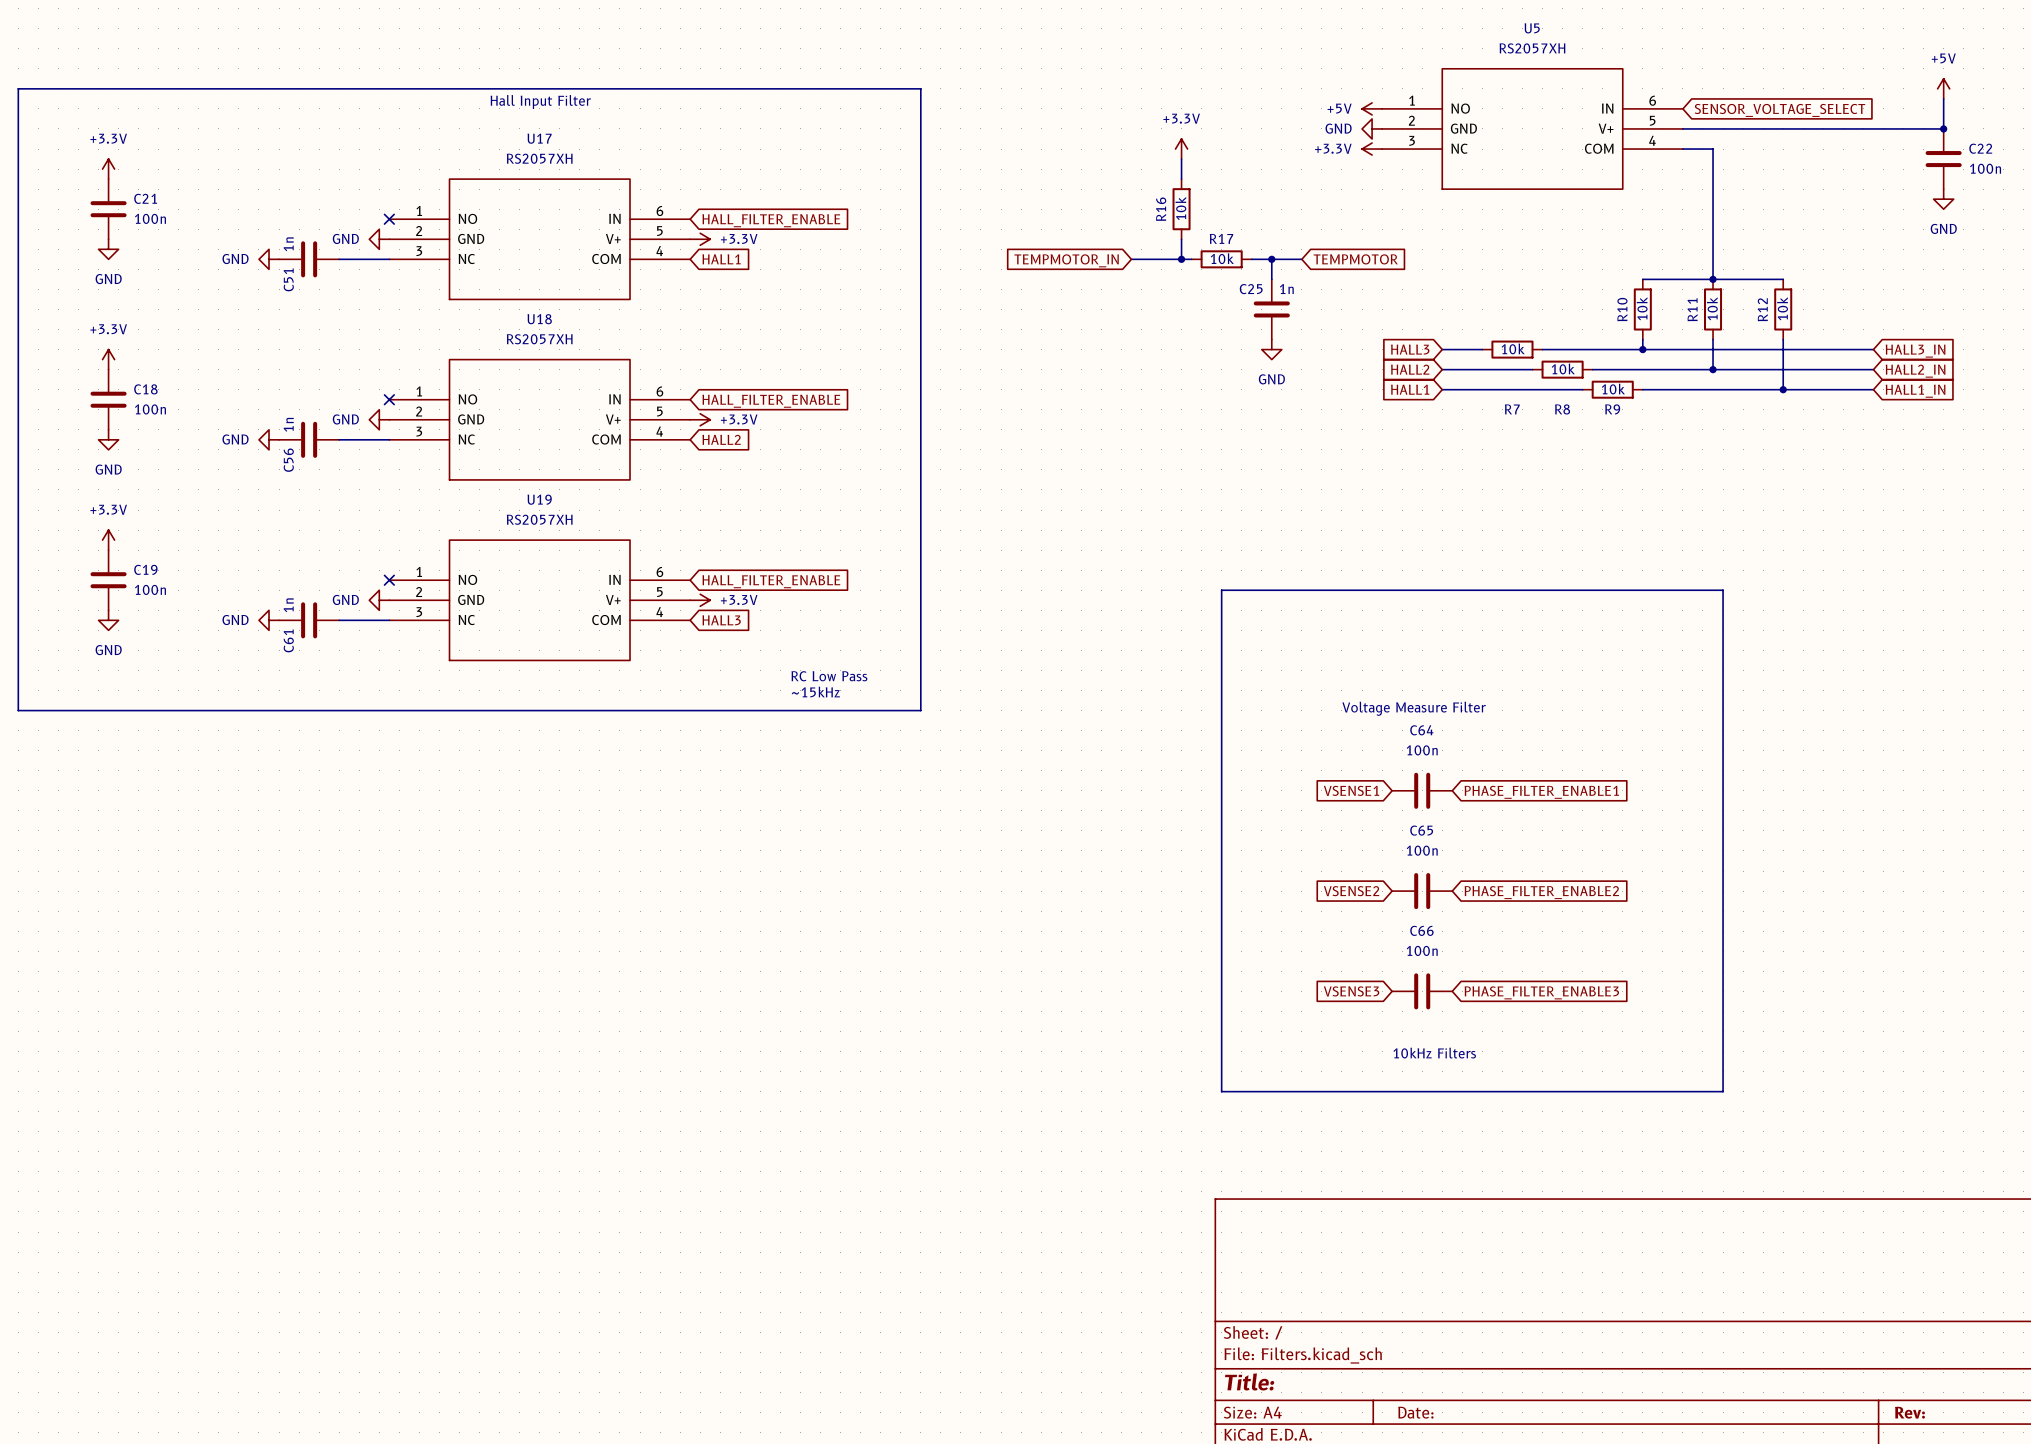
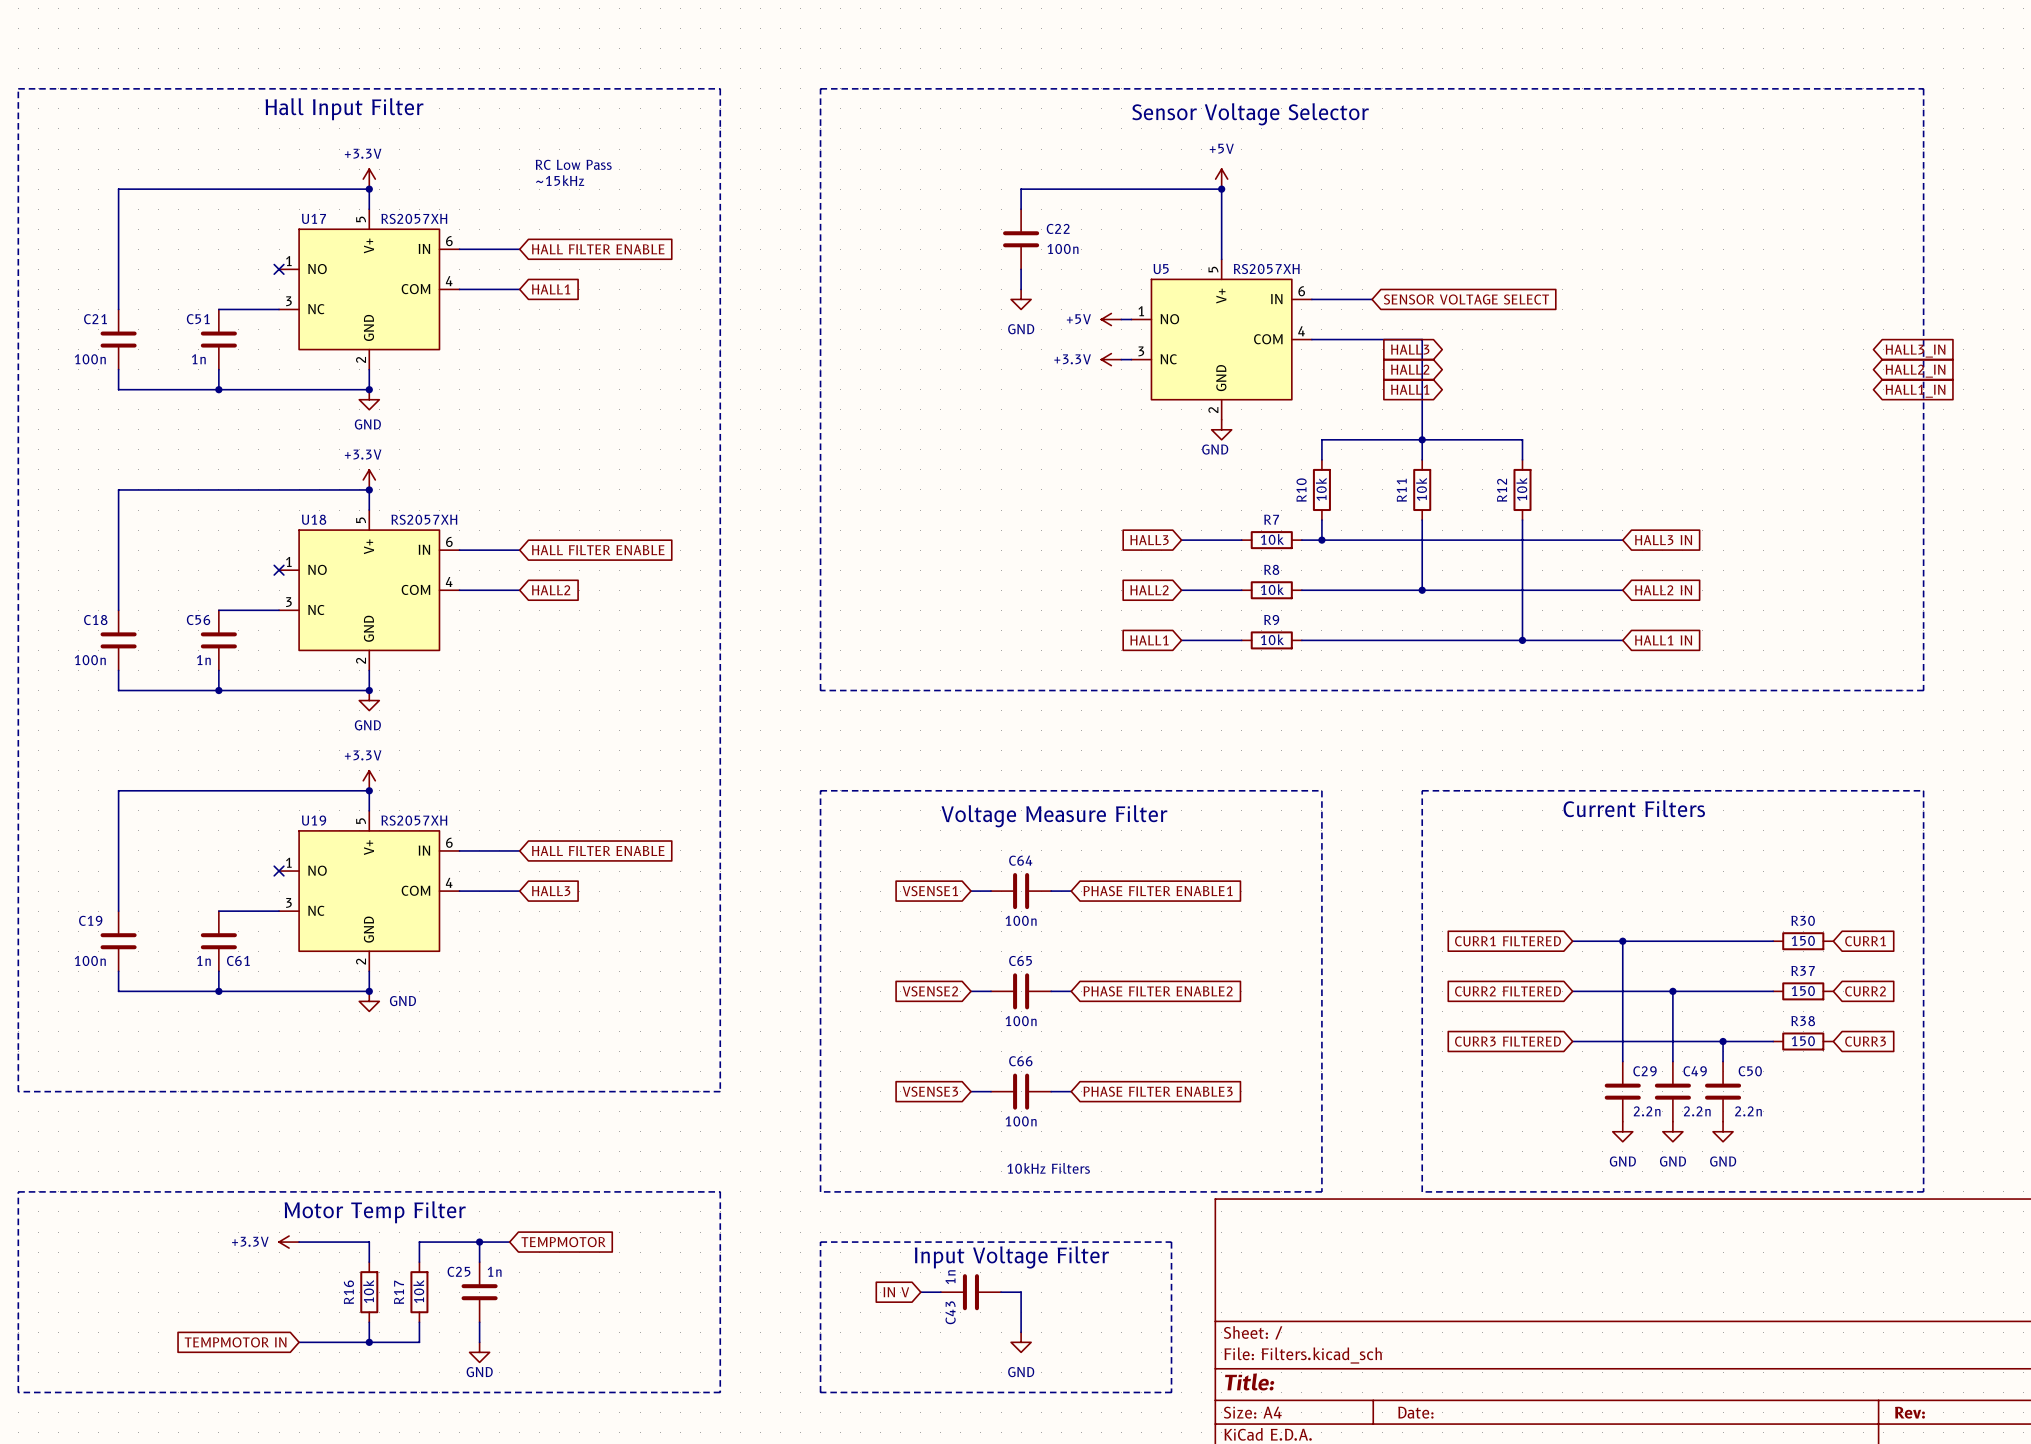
U5 name position: U5 (1532, 28) -> U5 (1161, 269)
U5 value position: RS2057XH (1532, 48) -> RS2057XH (1266, 269)
U5 symbol: [1382, 68, 1683, 190] -> [1131, 259, 1312, 420]
line: (18, 88) (920, 88) (920, 710) (18, 710) (18, 88) -> (18, 88) (18, 1091) (720, 1091) (720, 88) (18, 88)
line: none -> (820, 88) (820, 690) (1923, 690) (1923, 88) (820, 88)
power symbol: +5V (1943, 88) -> none
wire: (1943, 98) (1943, 128) (1682, 128) -> none
text: Hall Input Filter (540, 102) -> none
power symbol rotation: 0° (1372, 108) -> 90° clockwise (1221, 179)
power symbol position: +5V (1372, 108) -> +5V (1221, 179)
text: none -> Hall Input Filter (344, 109)
global label: SENSOR_VOLTAGE_SELECT (1779, 110) -> none
text: none -> Sensor Voltage Selector (1250, 114)
power symbol: GND (1372, 128) -> none
junction: (1943, 128) -> none
U17 name position: U17 (539, 138) -> U17 (313, 218)
power symbol: +3.3V (1181, 149) -> none
power symbol: +3.3V (1372, 149) -> none
wire: (1682, 149) (1713, 149) (1713, 279) -> none
U17 value position: RS2057XH (539, 158) -> RS2057XH (414, 218)
wire: (1181, 159) (1181, 179) -> none
C22 position: (1943, 159) -> (1021, 239)
text: none -> RC Low Pass (573, 164)
power symbol: +3.3V (108, 169) -> none
power symbol: none -> +3.3V (369, 179)
U17 symbol: [389, 179, 691, 300] -> [279, 209, 460, 370]
text: none -> ~15kHz (560, 180)
junction: none -> (369, 189)
junction: none -> (1221, 189)
C21 name position: C21 (145, 198) -> C21 (95, 319)
power symbol: GND (1943, 199) -> none
C21 position: (108, 209) -> (118, 339)
wire: none -> (369, 209) (369, 189) (118, 189) (118, 309)
wire: none -> (1021, 209) (1021, 189) (1221, 189) (1221, 259)
R16 position: (1181, 209) -> (369, 1292)
C21 value position: 100n (150, 218) -> 100n (90, 359)
no-connect mark: (389, 219) -> none
global label: HALL_FILTER_ENABLE (771, 220) -> none
R17 name position: R17 (1221, 238) -> R17 (398, 1292)
power symbol: GND (379, 239) -> none
power symbol: +3.3V (700, 239) -> none
wire: (1181, 239) (1181, 259) -> (1021, 269) (1021, 289)
C51 value position: 1n (288, 244) -> 1n (198, 359)
power symbol: GND (108, 249) -> none
wire: none -> (459, 249) (519, 249)
global label: none -> HALL FILTER ENABLE (598, 249)
power symbol: GND (269, 259) -> none
C51 rotation: 0° (309, 259) -> 90° clockwise (218, 339)
C51 position: (309, 259) -> (218, 339)
global label position: HALL1 (721, 259) -> HALL1 (551, 289)
wire: (1131, 259) (1191, 259) -> (1311, 299) (1372, 299)
junction: (1181, 259) -> none
R17 rotation: 0° (1221, 259) -> 90° clockwise (419, 1292)
R17 position: (1221, 259) -> (419, 1292)
wire: (1251, 259) (1301, 259) -> none
wire: (1271, 259) (1271, 279) -> none
junction: (1271, 259) -> none
global label: TEMPMOTOR (1355, 259) -> none
global label: TEMPMOTOR_IN (1066, 260) -> none
no-connect mark: none -> (279, 269)
wire: (1642, 279) (1783, 279) -> none
junction: (1713, 279) -> none
wire: none -> (459, 289) (519, 289)
power symbol: none -> GND (1021, 299)
global label: none -> SENSOR VOLTAGE SELECT (1466, 299)
wire: none -> (218, 309) (279, 309)
C25 position: (1271, 309) -> (479, 1292)
R10 position: (1642, 309) -> (1321, 489)
R11 position: (1713, 309) -> (1422, 489)
R12 position: (1783, 309) -> (1522, 489)
U18 name position: U18 (539, 319) -> U18 (314, 519)
power symbol: none -> +5V (1111, 319)
wire: none -> (1121, 319) (1131, 319)
U18 value position: RS2057XH (539, 339) -> RS2057XH (424, 519)
wire: none -> (1311, 339) (1422, 339) (1422, 459)
wire: (1642, 339) (1642, 349) -> none
wire: (1713, 339) (1713, 369) -> none
wire: (1783, 339) (1783, 389) -> none
power symbol position: GND (1271, 349) -> GND (1221, 429)
wire: (1442, 349) (1482, 349) -> none
R7 position: (1512, 349) -> (1271, 540)
wire: (1542, 349) (1873, 349) -> none
junction: (1642, 349) -> none
power symbol: +3.3V (108, 359) -> none
U18 symbol: [389, 359, 691, 480] -> [279, 510, 460, 671]
power symbol: none -> +3.3V (1111, 359)
wire: none -> (1121, 359) (1131, 359)
wire: none -> (118, 369) (118, 389) (369, 389) (369, 369)
wire: none -> (218, 369) (218, 389)
wire: (1442, 369) (1532, 369) -> none
R8 position: (1562, 369) -> (1271, 590)
wire: (1592, 369) (1873, 369) -> none
junction: (1713, 369) -> none
power symbol text position: GND (1271, 379) -> GND (1215, 449)
C18 name position: C18 (145, 389) -> C18 (95, 620)
junction: none -> (218, 389)
junction: none -> (369, 389)
wire: (1442, 389) (1582, 389) -> none
R9 position: (1612, 389) -> (1271, 640)
wire: (1642, 389) (1873, 389) -> none
junction: (1783, 389) -> none
C18 position: (108, 399) -> (118, 640)
no-connect mark: (389, 399) -> none
global label: HALL_FILTER_ENABLE (771, 401) -> none
C18 value position: 100n (150, 409) -> 100n (90, 660)
R7 name position: R7 (1512, 409) -> R7 (1271, 519)
R8 name position: R8 (1562, 409) -> R8 (1271, 569)
R9 name position: R9 (1612, 409) -> R9 (1271, 620)
power symbol rotation: 0° (379, 419) -> 90° counterclockwise (369, 399)
power symbol position: GND (379, 419) -> GND (369, 399)
power symbol: +3.3V (700, 419) -> none
C56 value position: 1n (288, 424) -> 1n (203, 660)
power symbol: GND (108, 439) -> none
power symbol: GND (269, 439) -> none
C56 rotation: 0° (309, 439) -> 90° clockwise (218, 640)
C56 position: (309, 439) -> (218, 640)
wire: (339, 439) (389, 439) -> none
global label: HALL2 (721, 439) -> none
junction: none -> (1422, 439)
wire: none -> (1321, 459) (1321, 439) (1522, 439) (1522, 459)
power symbol: none -> +3.3V (369, 479)
junction: none -> (369, 489)
U19 name position: U19 (539, 499) -> U19 (314, 820)
wire: none -> (369, 510) (369, 489) (118, 489) (118, 610)
U19 value position: RS2057XH (539, 519) -> RS2057XH (414, 820)
wire: none -> (1321, 520) (1321, 540)
wire: none -> (1422, 520) (1422, 590)
wire: none -> (1522, 520) (1522, 640)
power symbol: +3.3V (108, 540) -> none
U19 symbol: [389, 540, 691, 661] -> [279, 810, 460, 972]
global label: none -> HALL3 (1149, 540)
wire: none -> (1181, 540) (1241, 540)
wire: none -> (1301, 540) (1622, 540)
junction: none -> (1321, 540)
global label: none -> HALL3 IN (1663, 540)
wire: none -> (459, 550) (519, 550)
global label: none -> HALL FILTER ENABLE (598, 550)
C19 name position: C19 (145, 569) -> C19 (90, 920)
no-connect mark: none -> (279, 570)
C19 position: (108, 580) -> (118, 941)
no-connect mark: (389, 580) -> none
global label: HALL_FILTER_ENABLE (771, 581) -> none
C19 value position: 100n (150, 589) -> 100n (90, 960)
wire: none -> (459, 590) (519, 590)
global label: none -> HALL2 (551, 590)
global label: none -> HALL2 (1149, 590)
wire: none -> (1181, 590) (1241, 590)
line: (1221, 590) (1723, 590) (1723, 1091) (1221, 1091) (1221, 590) -> none
junction: none -> (1422, 590)
global label: none -> HALL2 IN (1663, 590)
power symbol: GND (379, 600) -> none
power symbol: +3.3V (700, 600) -> none
C61 value position: 1n (288, 605) -> 1n (203, 960)
wire: none -> (218, 610) (279, 610)
power symbol: GND (108, 620) -> none
power symbol: GND (269, 620) -> none
C61 rotation: 0° (309, 620) -> 90° clockwise (218, 941)
C61 position: (309, 620) -> (218, 941)
global label: HALL3 (721, 620) -> none
C61 name position: C61 (288, 640) -> C61 (238, 960)
global label: none -> HALL1 (1149, 640)
wire: none -> (1181, 640) (1241, 640)
wire: none -> (1301, 640) (1622, 640)
junction: none -> (1522, 640)
global label: none -> HALL1 IN (1663, 640)
wire: none -> (118, 670) (118, 690) (369, 690) (369, 670)
wire: none -> (218, 670) (218, 690)
text: RC Low Pass (829, 676) -> none
junction: none -> (218, 690)
junction: none -> (369, 690)
text: ~15kHz (815, 692) -> none
power symbol: none -> GND (369, 700)
text: Voltage Measure Filter (1414, 708) -> none
C64 name position: C64 (1421, 730) -> C64 (1020, 860)
C64 value position: 100n (1422, 750) -> 100n (1021, 920)
power symbol: none -> +3.3V (369, 780)
junction: none -> (369, 790)
line: none -> (820, 790) (820, 1191) (1321, 1191) (1321, 790) (820, 790)
global label: VSENSE1 (1351, 790) -> none
line: none -> (1422, 790) (1923, 790) (1923, 1191) (1422, 1191) (1422, 790)
C64 position: (1422, 790) -> (1021, 891)
global label: PHASE_FILTER_ENABLE1 (1541, 792) -> none
text: none -> Current Filters (1634, 808)
wire: none -> (369, 810) (369, 790) (118, 790) (118, 911)
text: none -> Voltage Measure Filter (1054, 816)
C65 name position: C65 (1421, 830) -> C65 (1020, 960)
wire: none -> (459, 850) (519, 850)
global label: none -> HALL FILTER ENABLE (598, 850)
C65 value position: 100n (1422, 850) -> 100n (1021, 1021)
no-connect mark: none -> (279, 871)
wire: none -> (459, 891) (519, 891)
global label: none -> HALL3 (551, 891)
global label: none -> VSENSE1 (930, 891)
wire: none -> (970, 891) (991, 891)
wire: none -> (1051, 891) (1071, 891)
global label: none -> PHASE FILTER ENABLE1 (1158, 891)
global label: VSENSE2 (1351, 891) -> none
C65 position: (1422, 891) -> (1021, 991)
global label: PHASE_FILTER_ENABLE2 (1541, 892) -> none
wire: none -> (218, 911) (279, 911)
C66 name position: C66 (1421, 930) -> C66 (1020, 1061)
global label: none -> CURR1 FILTERED (1508, 941)
wire: none -> (1572, 941) (1773, 941)
wire: none -> (1622, 941) (1622, 1061)
junction: none -> (1622, 941)
R30: none -> 150 (1803, 941)
global label: none -> CURR1 (1865, 941)
C66 value position: 100n (1422, 950) -> 100n (1021, 1121)
wire: none -> (118, 971) (118, 991) (369, 991) (369, 971)
wire: none -> (218, 971) (218, 991)
junction: none -> (218, 991)
junction: none -> (369, 991)
global label: none -> VSENSE2 (930, 991)
wire: none -> (970, 991) (991, 991)
wire: none -> (1051, 991) (1071, 991)
global label: none -> PHASE FILTER ENABLE2 (1158, 991)
global label: VSENSE3 (1351, 991) -> none
C66 position: (1422, 991) -> (1021, 1091)
global label: none -> CURR2 FILTERED (1508, 991)
wire: none -> (1572, 991) (1773, 991)
wire: none -> (1672, 991) (1672, 1061)
junction: none -> (1672, 991)
R37: none -> 150 (1803, 991)
global label: none -> CURR2 (1865, 991)
global label: PHASE_FILTER_ENABLE3 (1541, 992) -> none
power symbol: none -> GND (369, 1001)
global label: none -> CURR3 FILTERED (1508, 1041)
wire: none -> (1572, 1041) (1773, 1041)
junction: none -> (1723, 1041)
R38: none -> 150 (1803, 1041)
global label: none -> CURR3 (1865, 1041)
text: 10kHz Filters (1434, 1053) -> none
global label: none -> VSENSE3 (930, 1091)
wire: none -> (970, 1091) (991, 1091)
wire: none -> (1051, 1091) (1071, 1091)
global label: none -> PHASE FILTER ENABLE3 (1158, 1091)
C29: none -> 2.2n (1622, 1091)
C49: none -> 2.2n (1672, 1091)
C50: none -> 2.2n (1723, 1091)
power symbol: none -> GND (1622, 1131)
power symbol: none -> GND (1672, 1131)
power symbol: none -> GND (1723, 1131)
text: none -> 10kHz Filters (1048, 1168)
line: none -> (18, 1191) (720, 1191) (720, 1392) (18, 1392) (18, 1191)
text: none -> Motor Temp Filter (375, 1212)
power symbol: none -> +3.3V (289, 1242)
wire: none -> (299, 1242) (369, 1242) (369, 1262)
wire: none -> (479, 1242) (479, 1262)
junction: none -> (479, 1242)
wire: none -> (509, 1242) (419, 1242) (419, 1262)
global label: none -> TEMPMOTOR (563, 1242)
line: none -> (820, 1242) (1171, 1242) (1171, 1392) (820, 1392) (820, 1242)
text: none -> Input Voltage Filter (1011, 1257)
global label: none -> IN V (896, 1292)
wire: none -> (920, 1292) (940, 1292)
C43: none -> 1n (970, 1292)
wire: none -> (1001, 1292) (1021, 1292) (1021, 1332)
wire: none -> (369, 1322) (369, 1342)
wire: none -> (419, 1322) (419, 1342) (299, 1342)
wire: none -> (479, 1322) (479, 1342)
global label: none -> TEMPMOTOR IN (235, 1342)
junction: none -> (369, 1342)
power symbol: none -> GND (1021, 1342)
power symbol: none -> GND (479, 1352)

